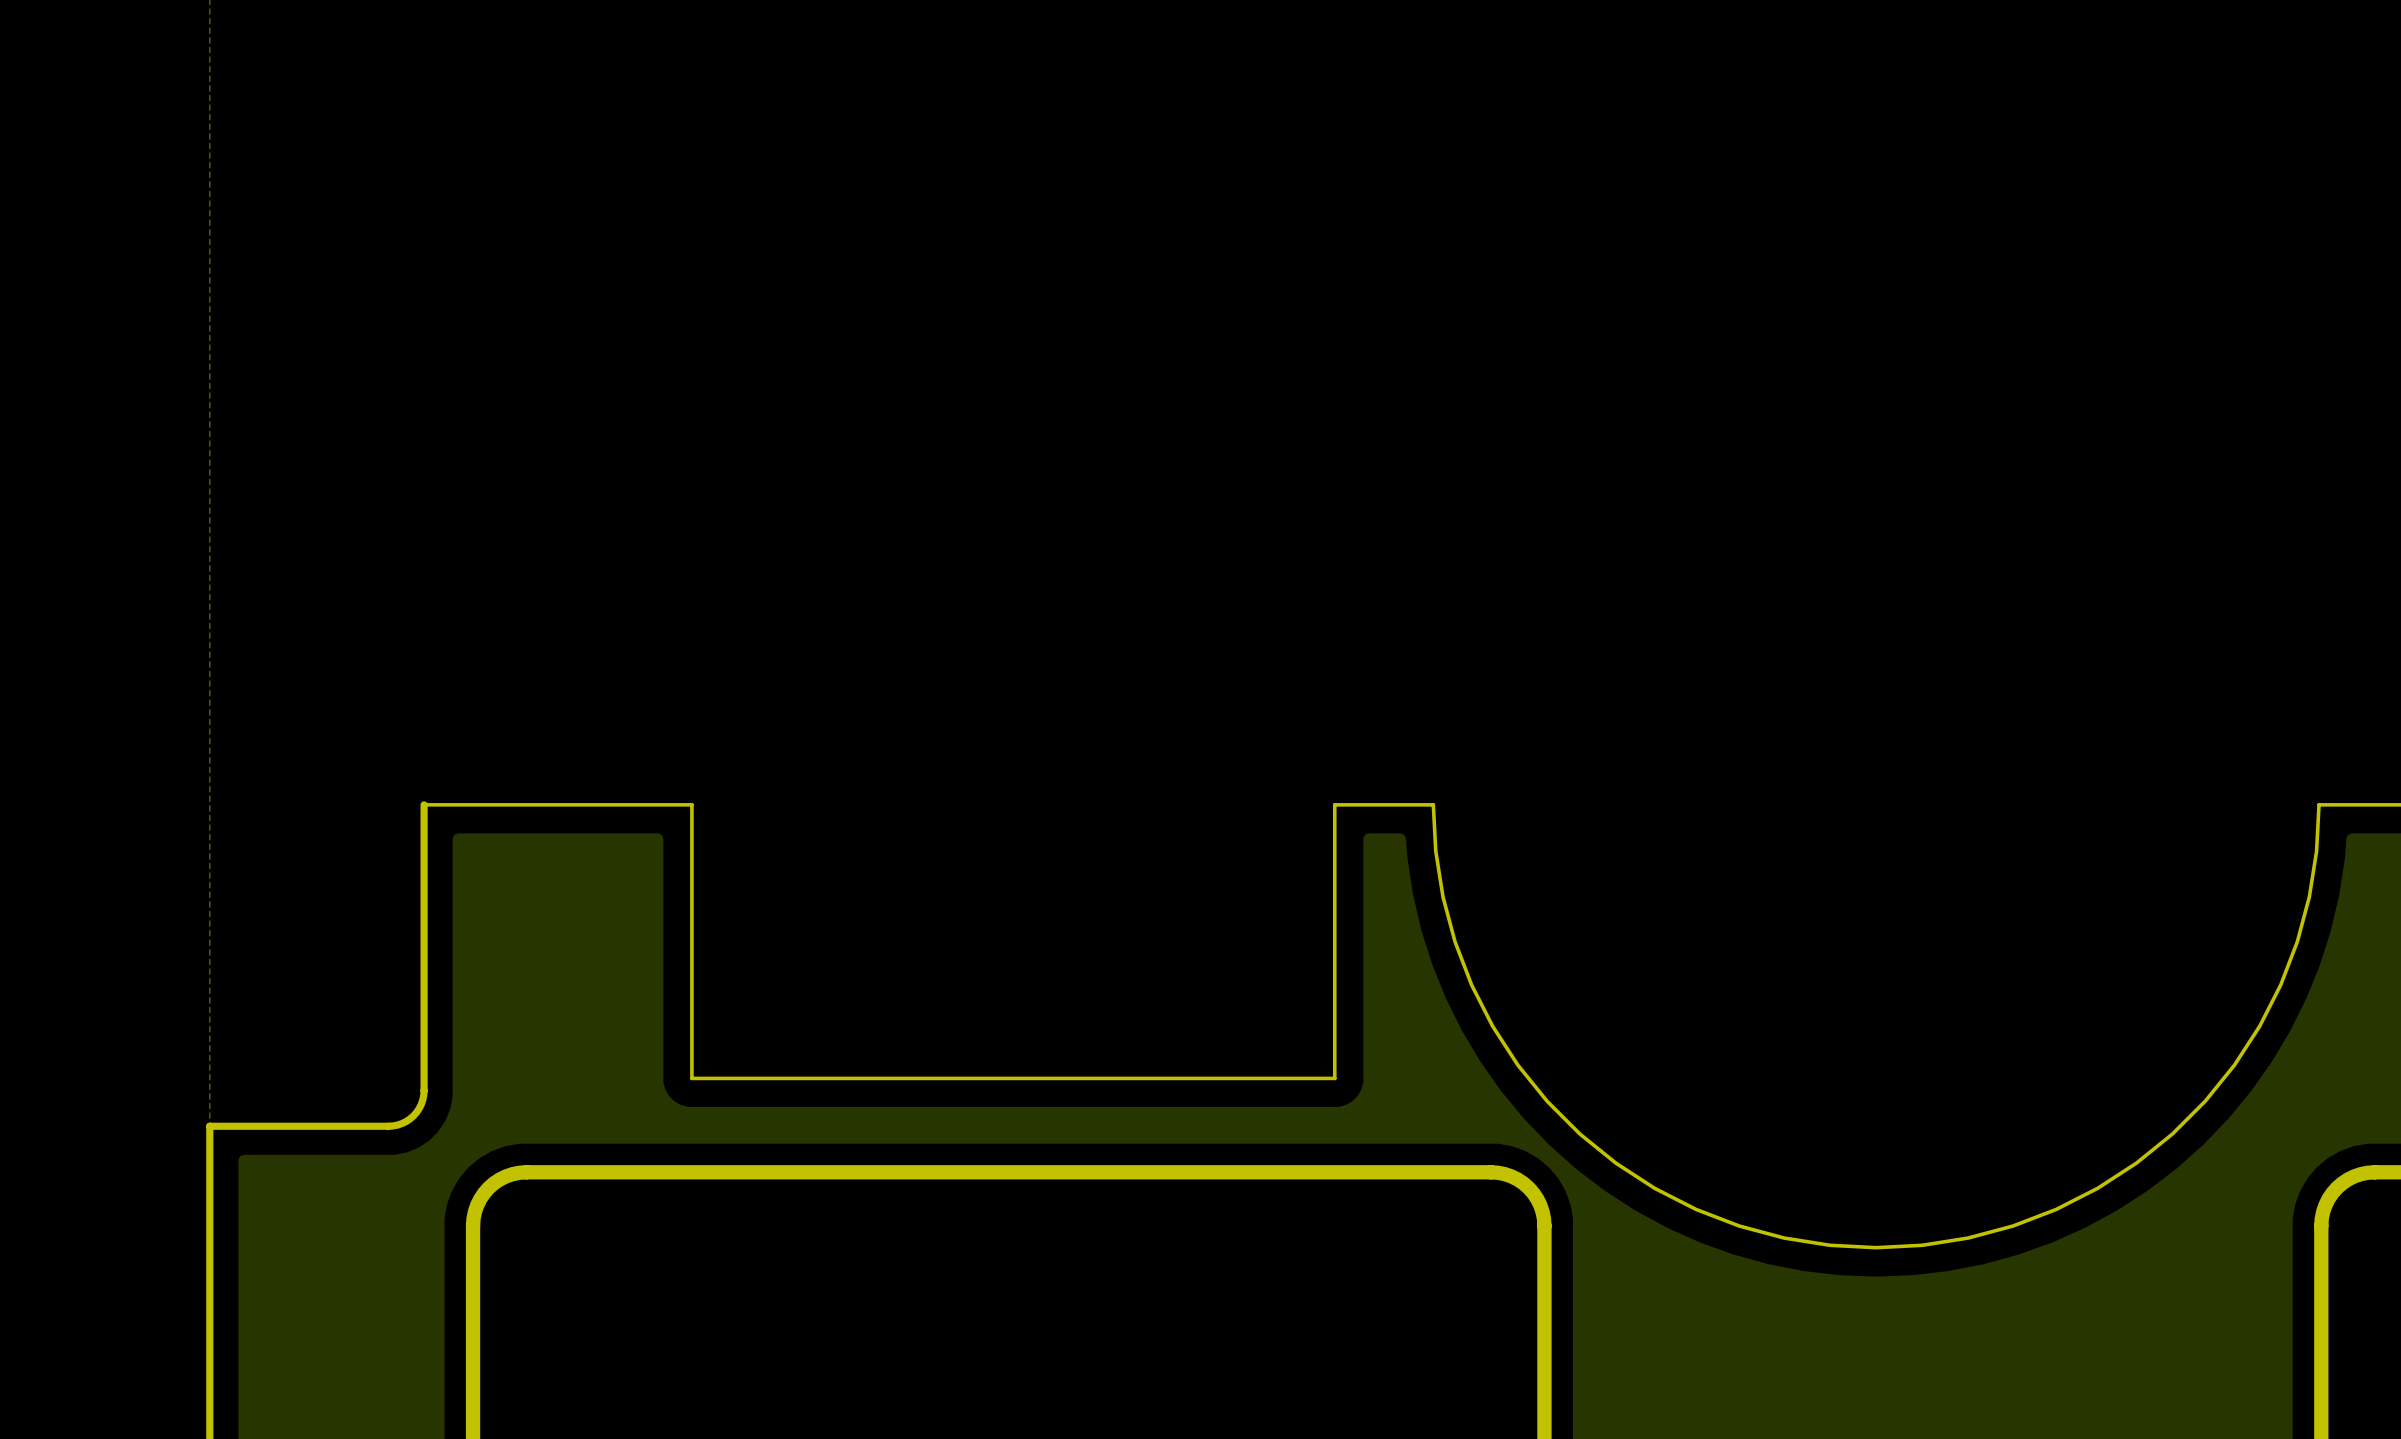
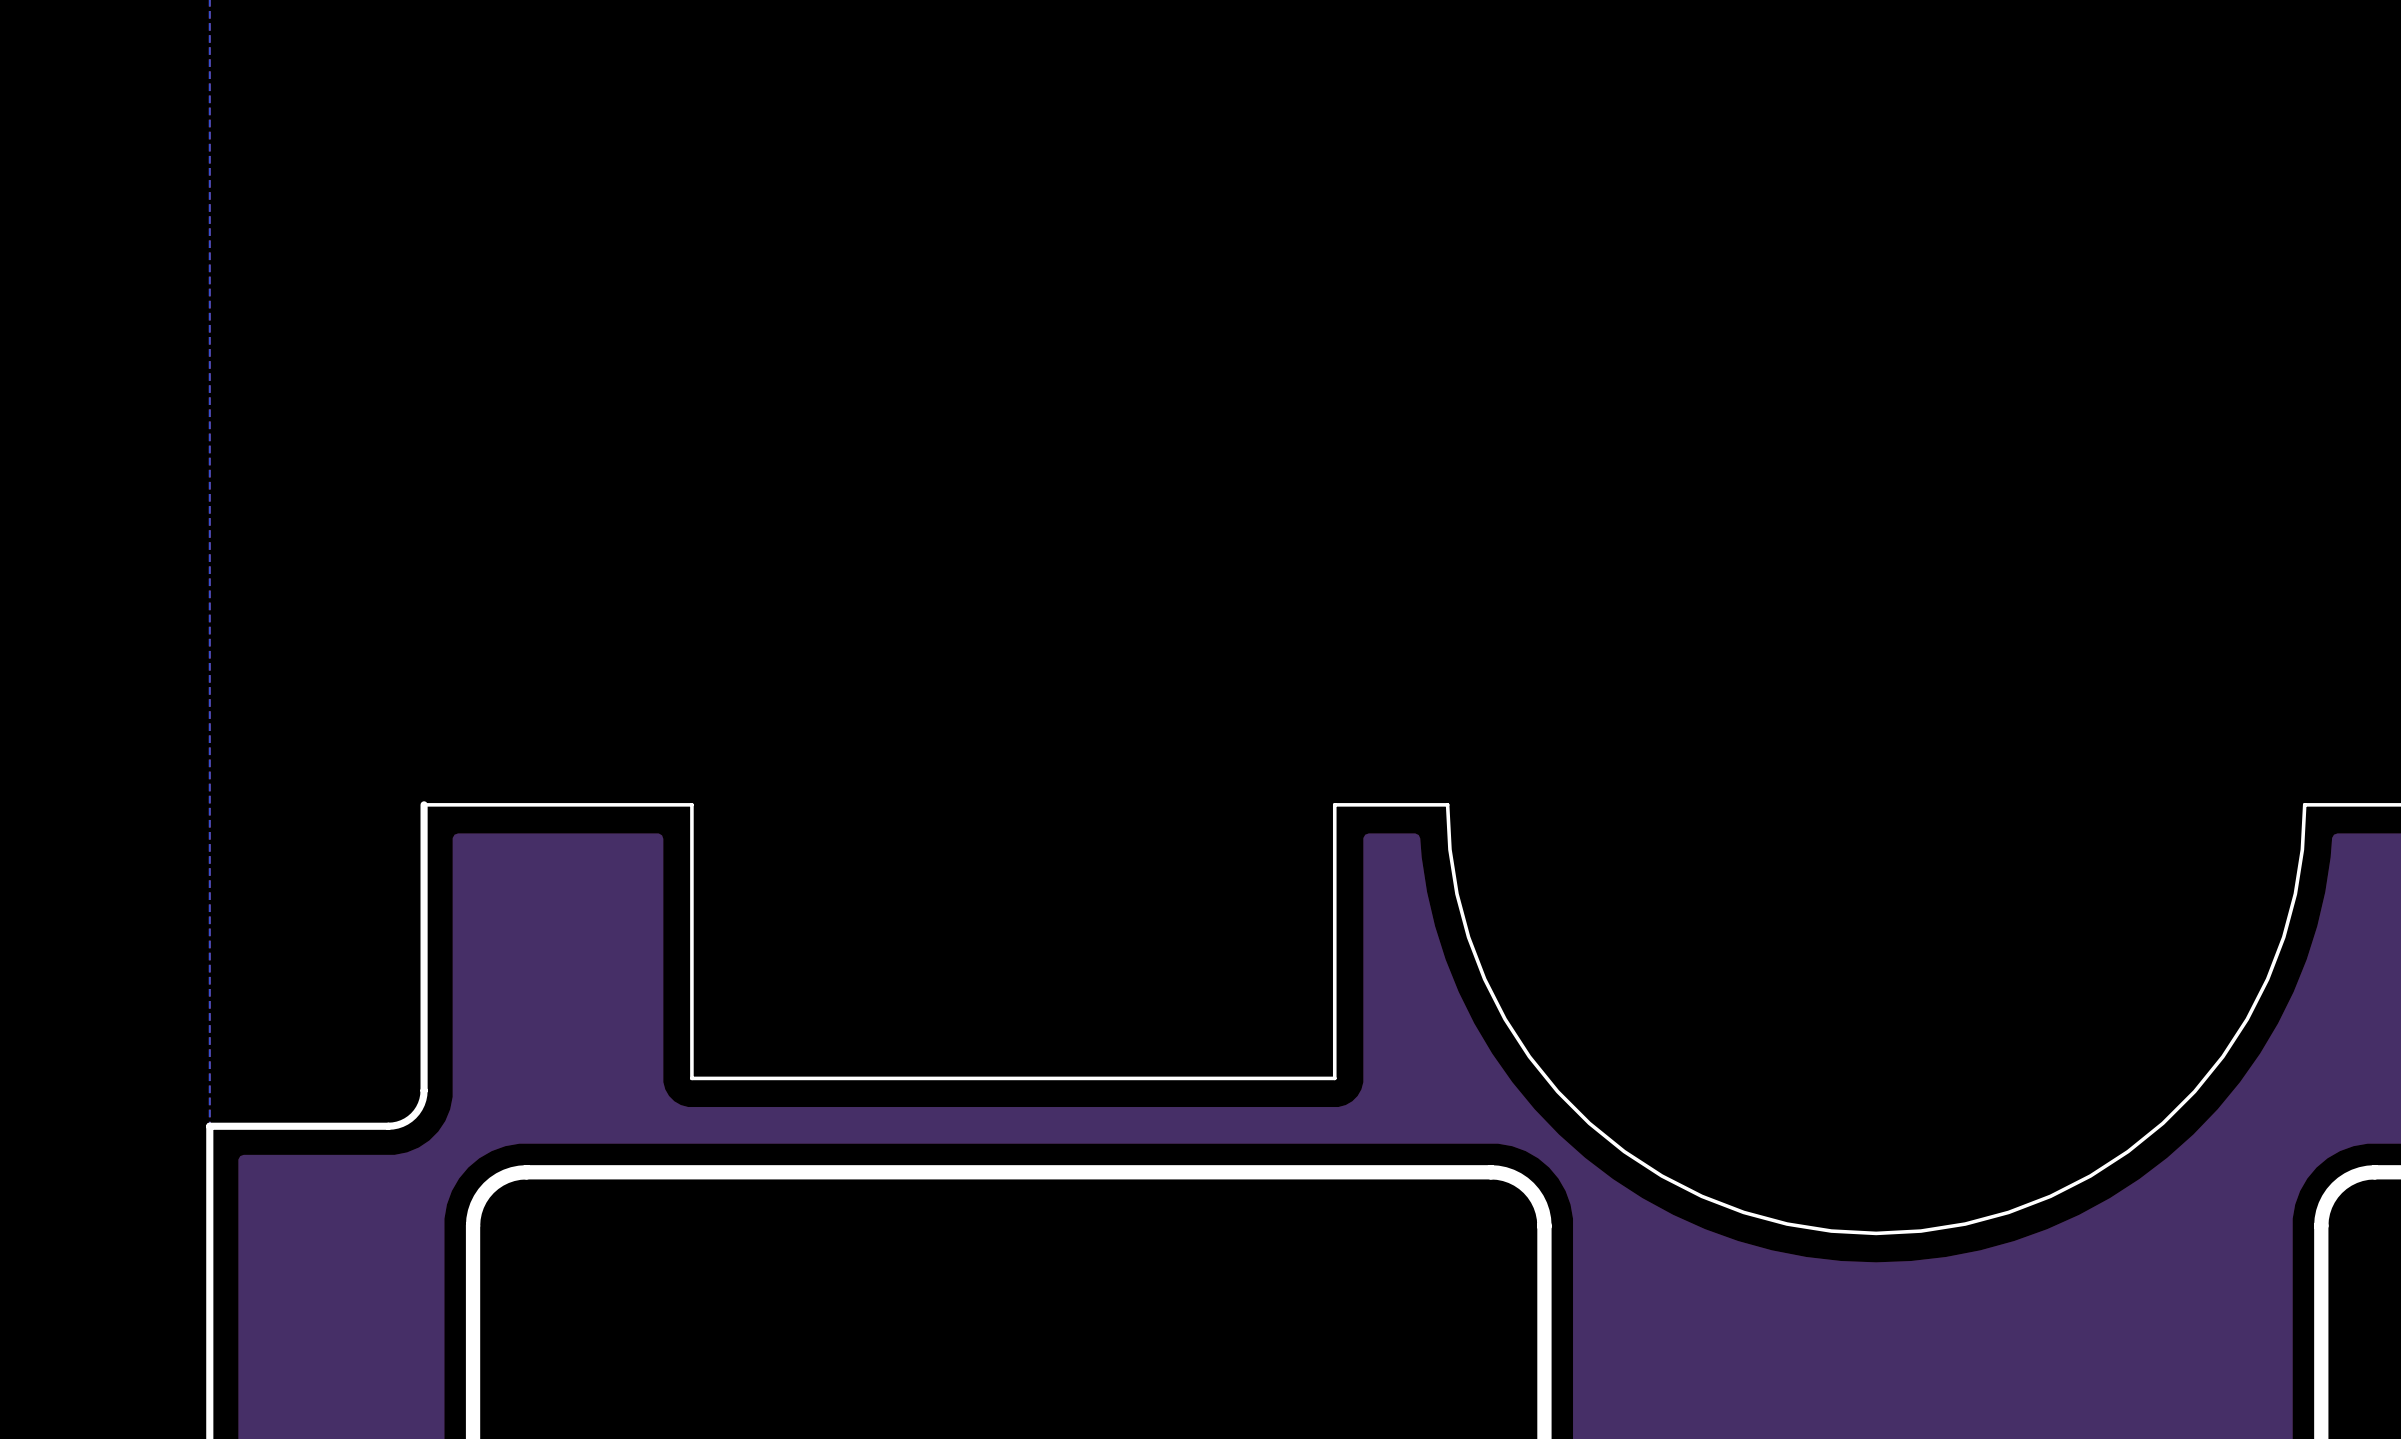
board edge: (2319, 804) (2316, 851) (2309, 896) (2297, 941) (2280, 984) (2259, 1026) (2234, 1065) (2205, 1101) (2172, 1133) (2136, 1163) (2097, 1188) (2056, 1209) (2013, 1226) (1968, 1238) (1922, 1245) (1876, 1247) (1829, 1245) (1784, 1238) (1739, 1226) (1696, 1209) (1654, 1188) (1615, 1163) (1579, 1133) (1547, 1101) (1517, 1065) (1492, 1026) (1471, 984) (1455, 941) (1443, 896) (1435, 851) (1433, 804) -> (2319, 804) (2304, 804) (2302, 849) (2295, 893) (2283, 937) (2267, 979) (2247, 1019) (2222, 1056) (2194, 1091) (2162, 1123) (2128, 1151) (2090, 1175) (2050, 1196) (2008, 1212) (1965, 1224) (1920, 1231) (1876, 1233) (1831, 1231) (1787, 1224) (1743, 1212) (1701, 1196) (1661, 1175) (1624, 1151) (1589, 1123) (1557, 1091) (1529, 1056) (1505, 1019) (1484, 979) (1468, 937) (1456, 893) (1449, 849) (1447, 804) (1433, 804)

